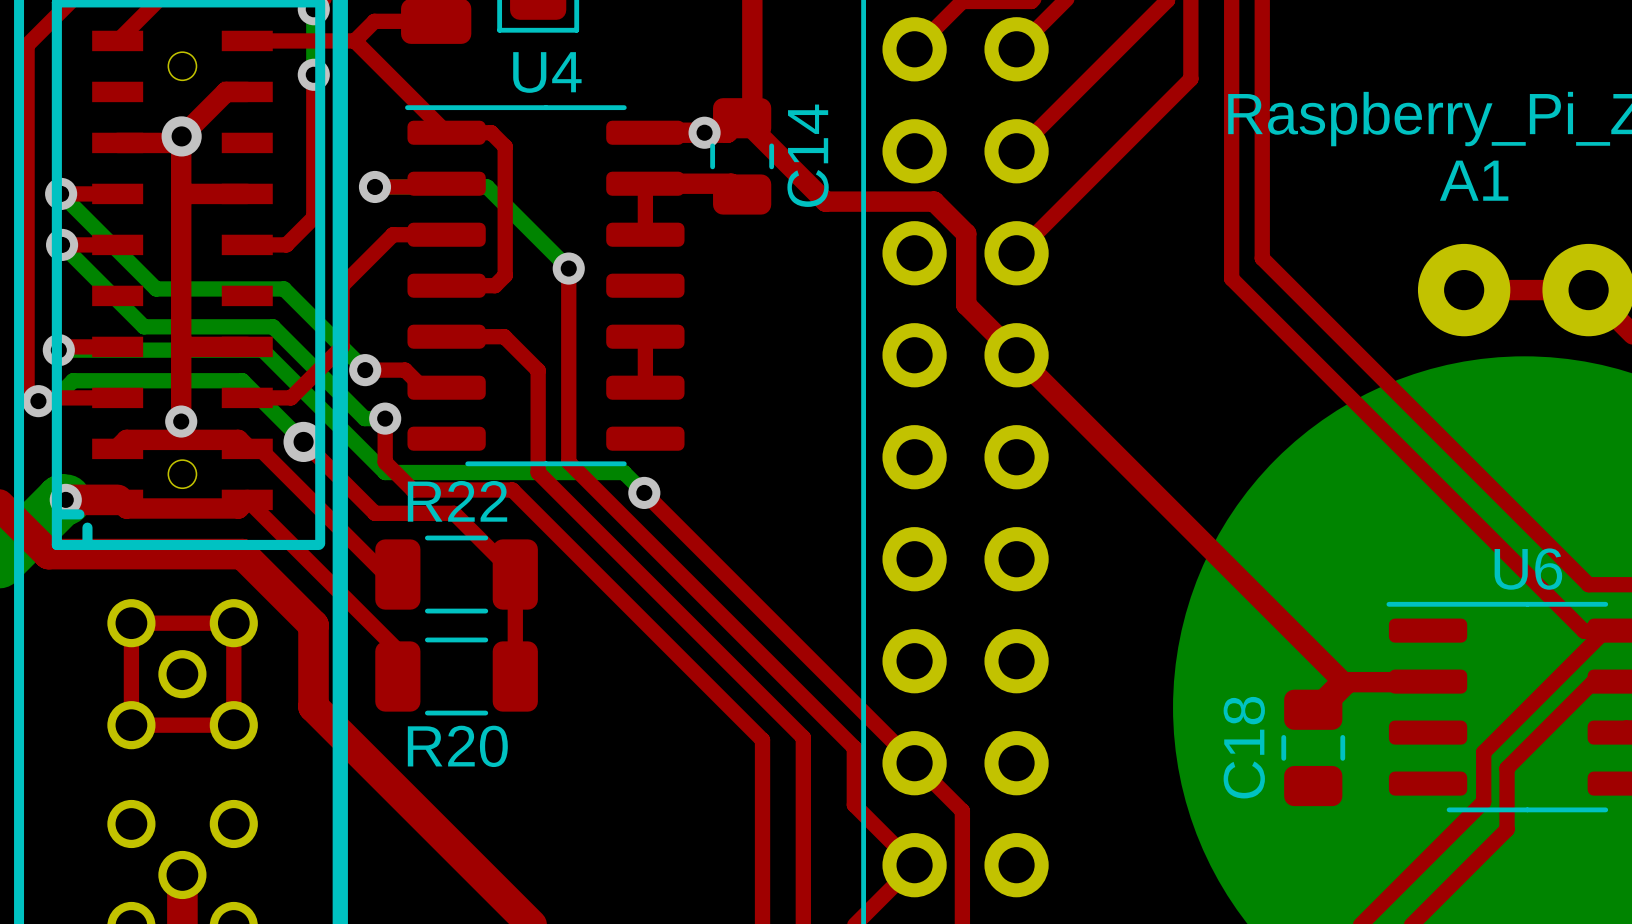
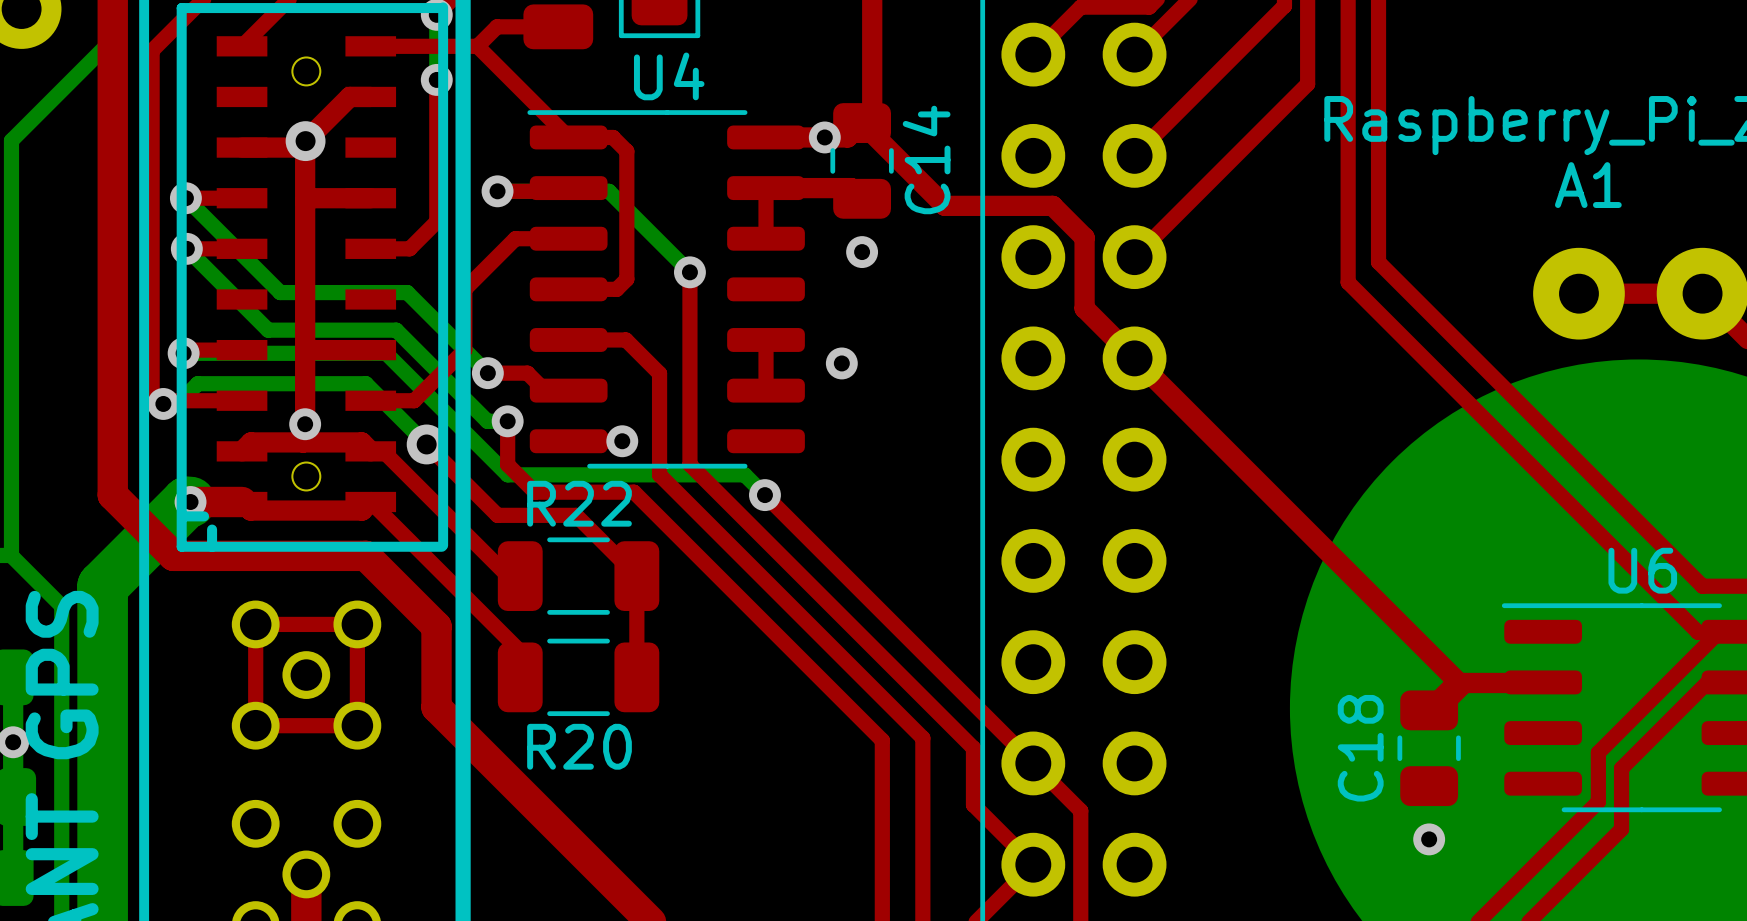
via: none -> (862, 252)
via: none -> (841, 363)
via: none -> (622, 441)
via: none -> (1429, 839)

